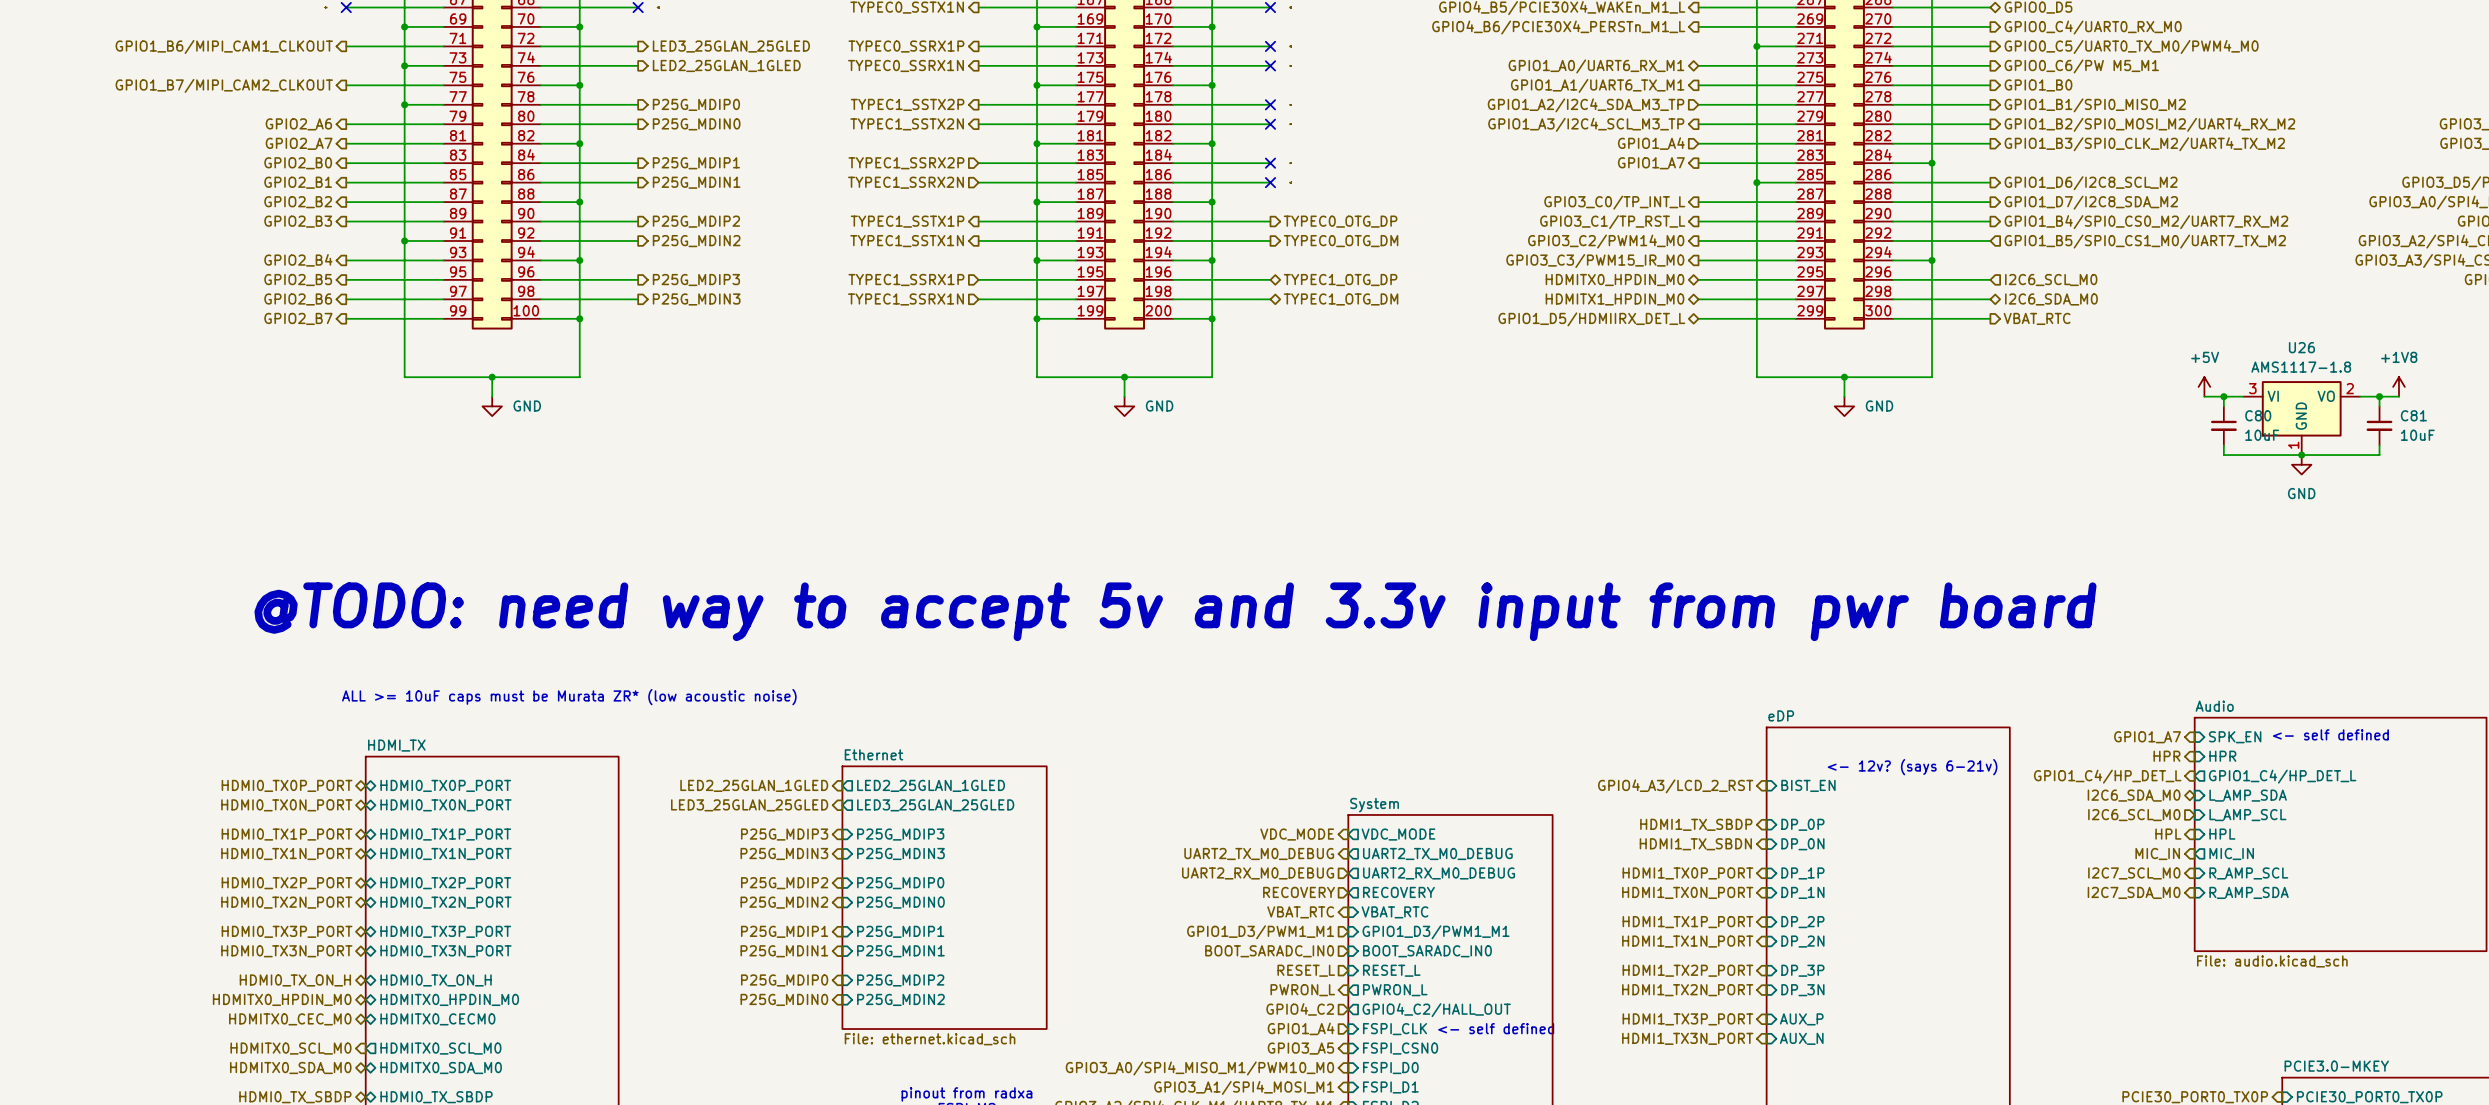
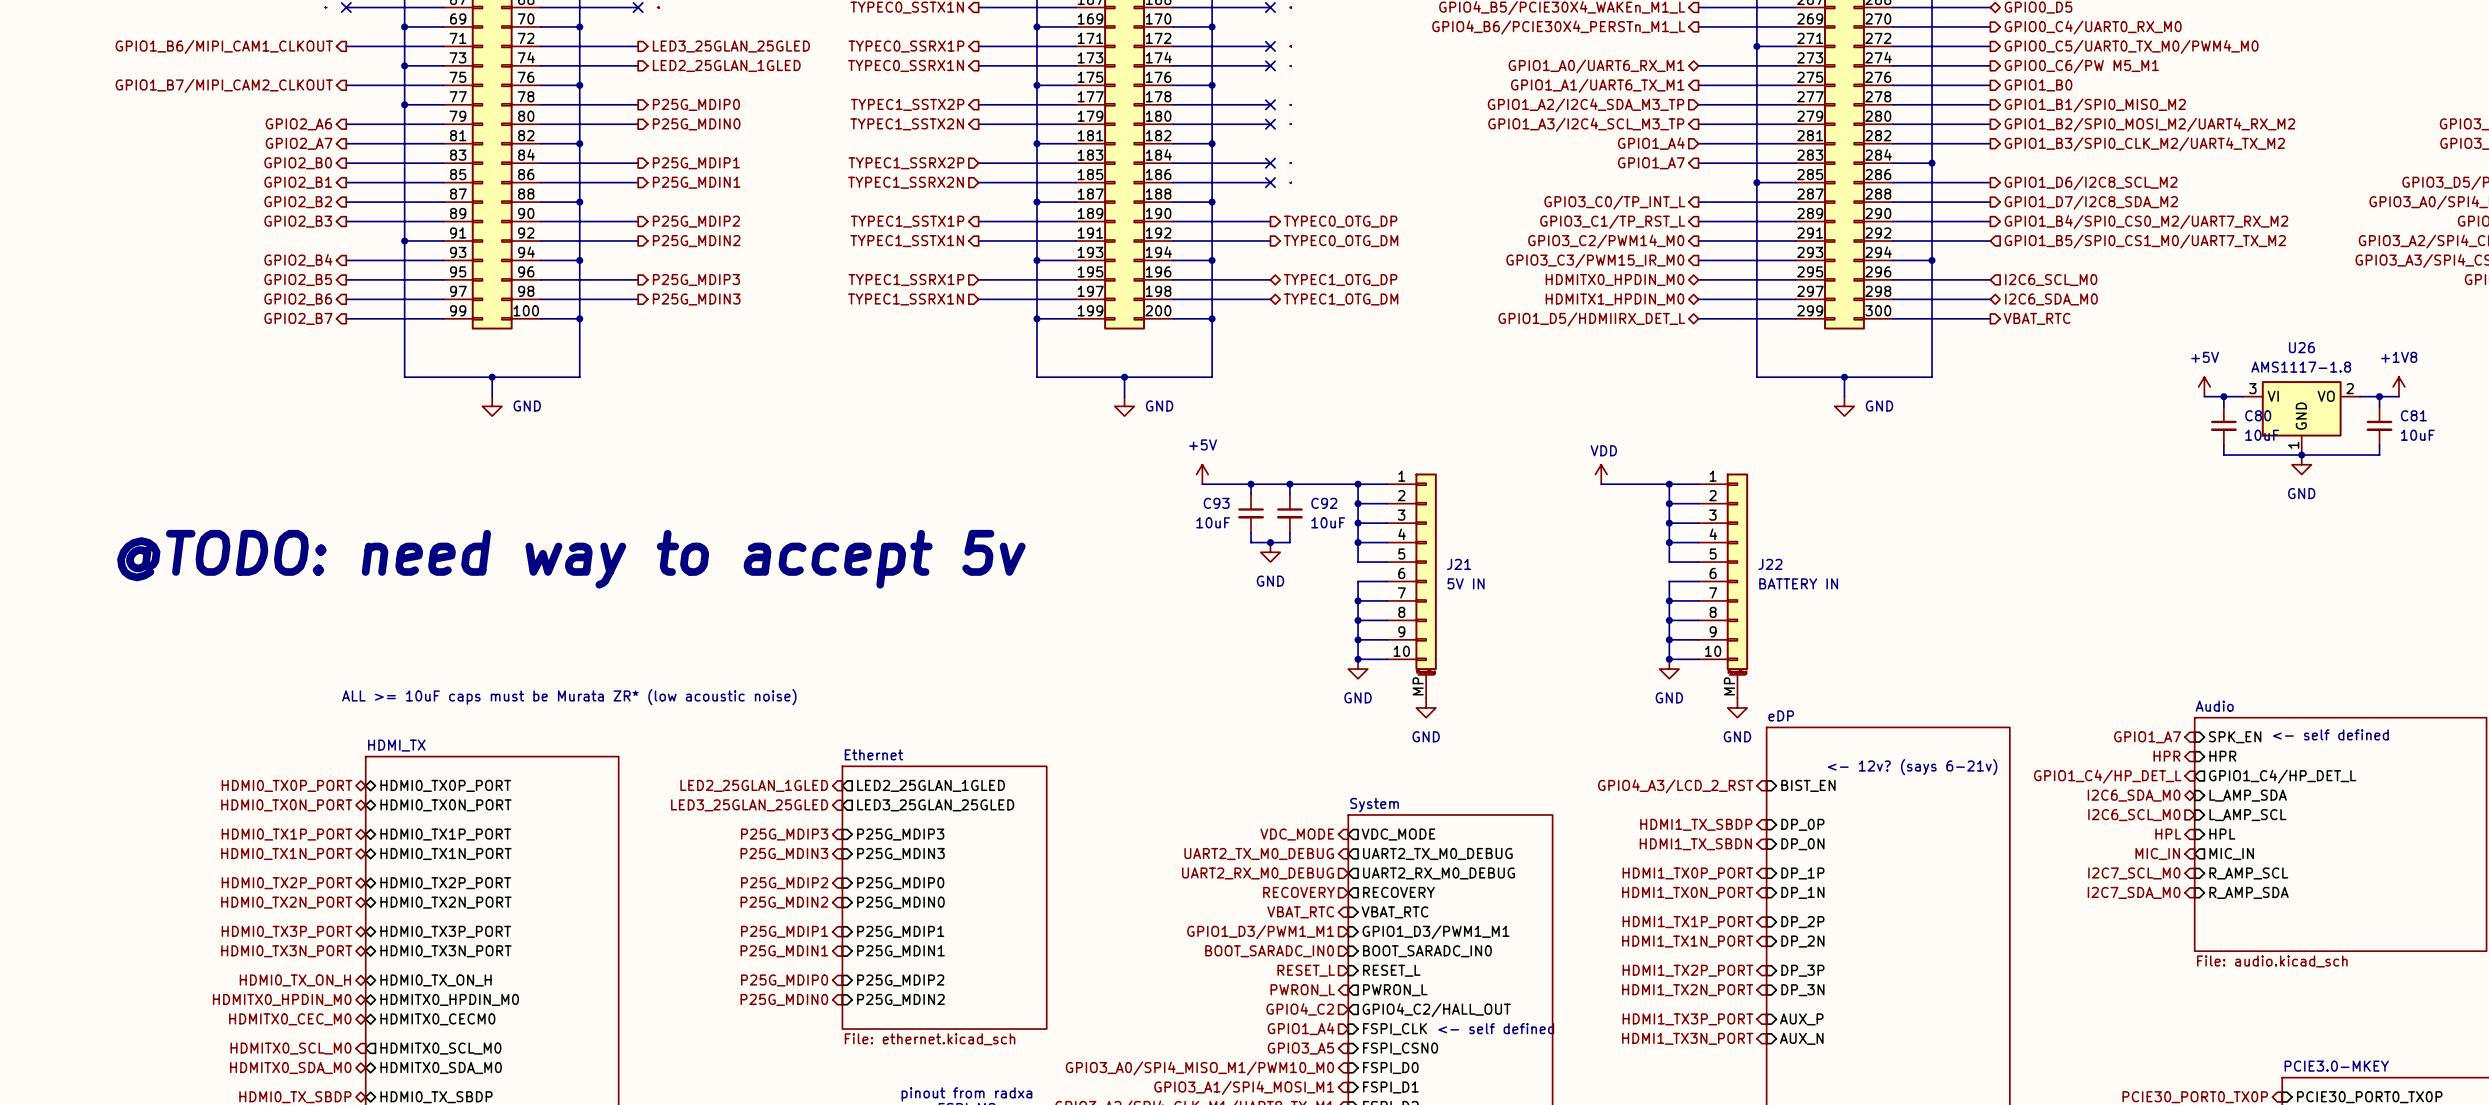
power symbol: none -> +5V (1202, 474)
power symbol: none -> VDD (1601, 474)
wire: none -> (1202, 484) (1387, 484)
wire: none -> (1251, 484) (1251, 493)
junction: none -> (1251, 484)
wire: none -> (1289, 484) (1289, 493)
junction: none -> (1289, 484)
wire: none -> (1358, 484) (1358, 562) (1387, 562)
junction: none -> (1358, 484)
wire: none -> (1601, 484) (1698, 484)
wire: none -> (1669, 484) (1669, 562) (1698, 562)
junction: none -> (1669, 484)
wire: none -> (1358, 503) (1387, 503)
junction: none -> (1358, 503)
wire: none -> (1669, 503) (1698, 503)
junction: none -> (1669, 503)
C93: none -> 10uF (1251, 513)
C92: none -> 10uF (1289, 513)
wire: none -> (1358, 523) (1387, 523)
junction: none -> (1358, 523)
wire: none -> (1669, 523) (1698, 523)
junction: none -> (1669, 523)
wire: none -> (1251, 532) (1251, 542) (1289, 542) (1289, 532)
junction: none -> (1270, 542)
wire: none -> (1358, 542) (1387, 542)
junction: none -> (1358, 542)
wire: none -> (1669, 542) (1698, 542)
junction: none -> (1669, 542)
power symbol: none -> GND (1270, 552)
text: none -> @TODO: need way to accept 5v (571, 559)
wire: none -> (1387, 581) (1358, 581) (1358, 659) (1387, 659)
wire: none -> (1698, 581) (1669, 581) (1669, 659) (1698, 659)
J21: none -> 5V IN (1412, 585)
J22: none -> BATTERY IN (1723, 585)
wire: none -> (1358, 600) (1387, 600)
junction: none -> (1358, 600)
junction: none -> (1669, 600)
text: @TODO: need way to accept 5v and 3.3v input from pwr board (1175, 611) -> none
junction: none -> (1358, 620)
wire: none -> (1669, 620) (1698, 620)
junction: none -> (1669, 620)
wire: none -> (1358, 639) (1387, 639)
junction: none -> (1358, 639)
wire: none -> (1669, 639) (1698, 639)
junction: none -> (1669, 639)
junction: none -> (1358, 659)
junction: none -> (1669, 659)
power symbol: none -> GND (1358, 669)
power symbol: none -> GND (1669, 669)
power symbol: none -> GND (1426, 707)
power symbol: none -> GND (1737, 707)

